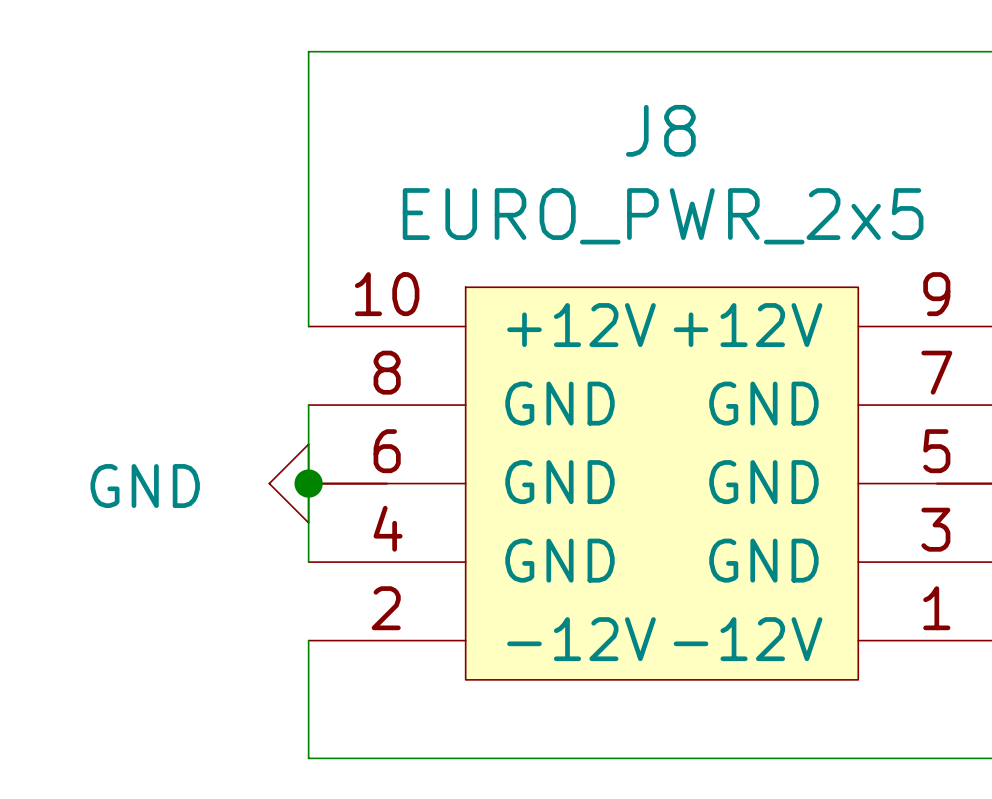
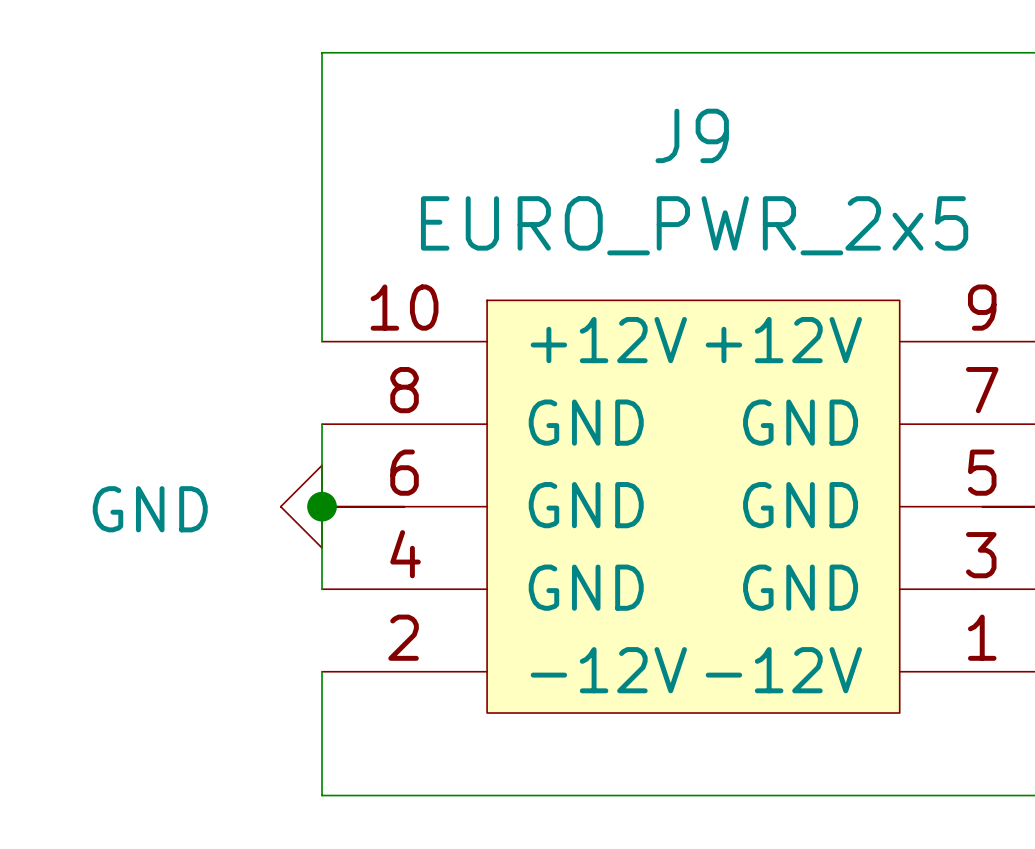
J8 name: J8 (660, 130) -> J9 (692, 135)

